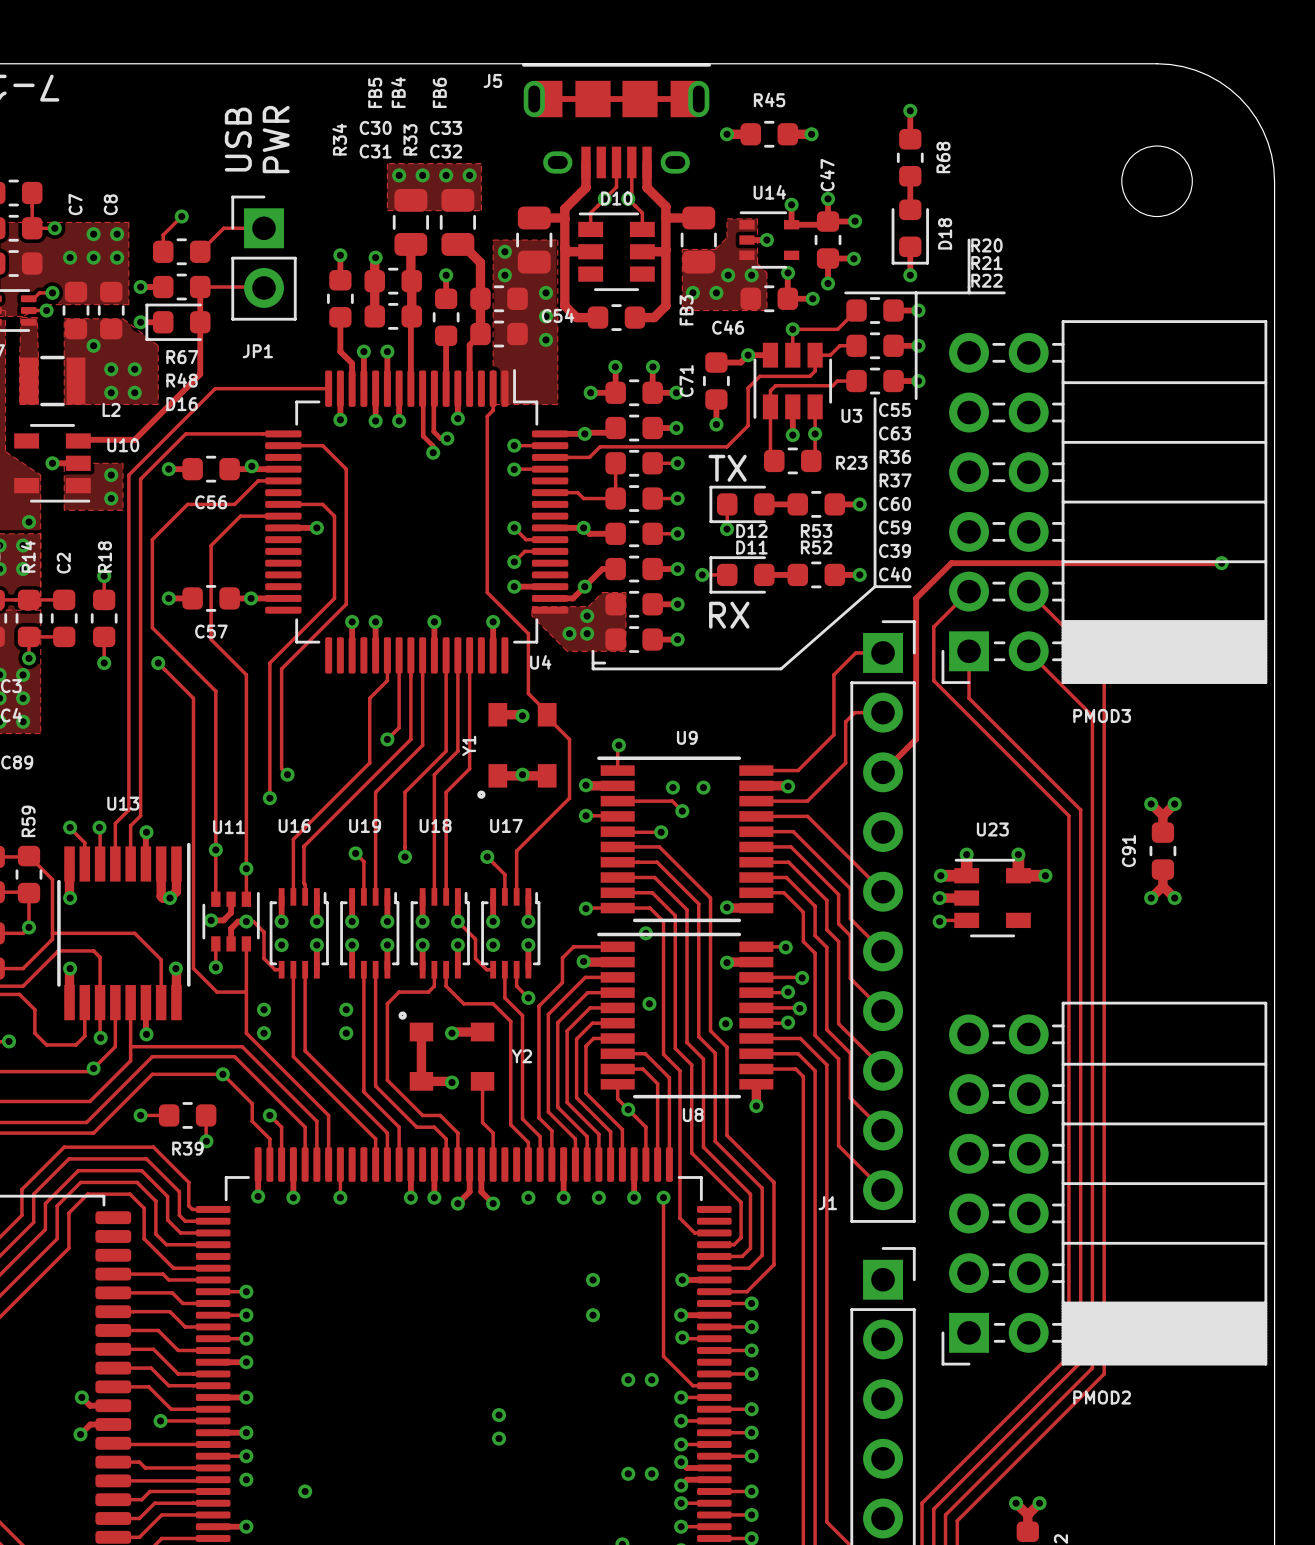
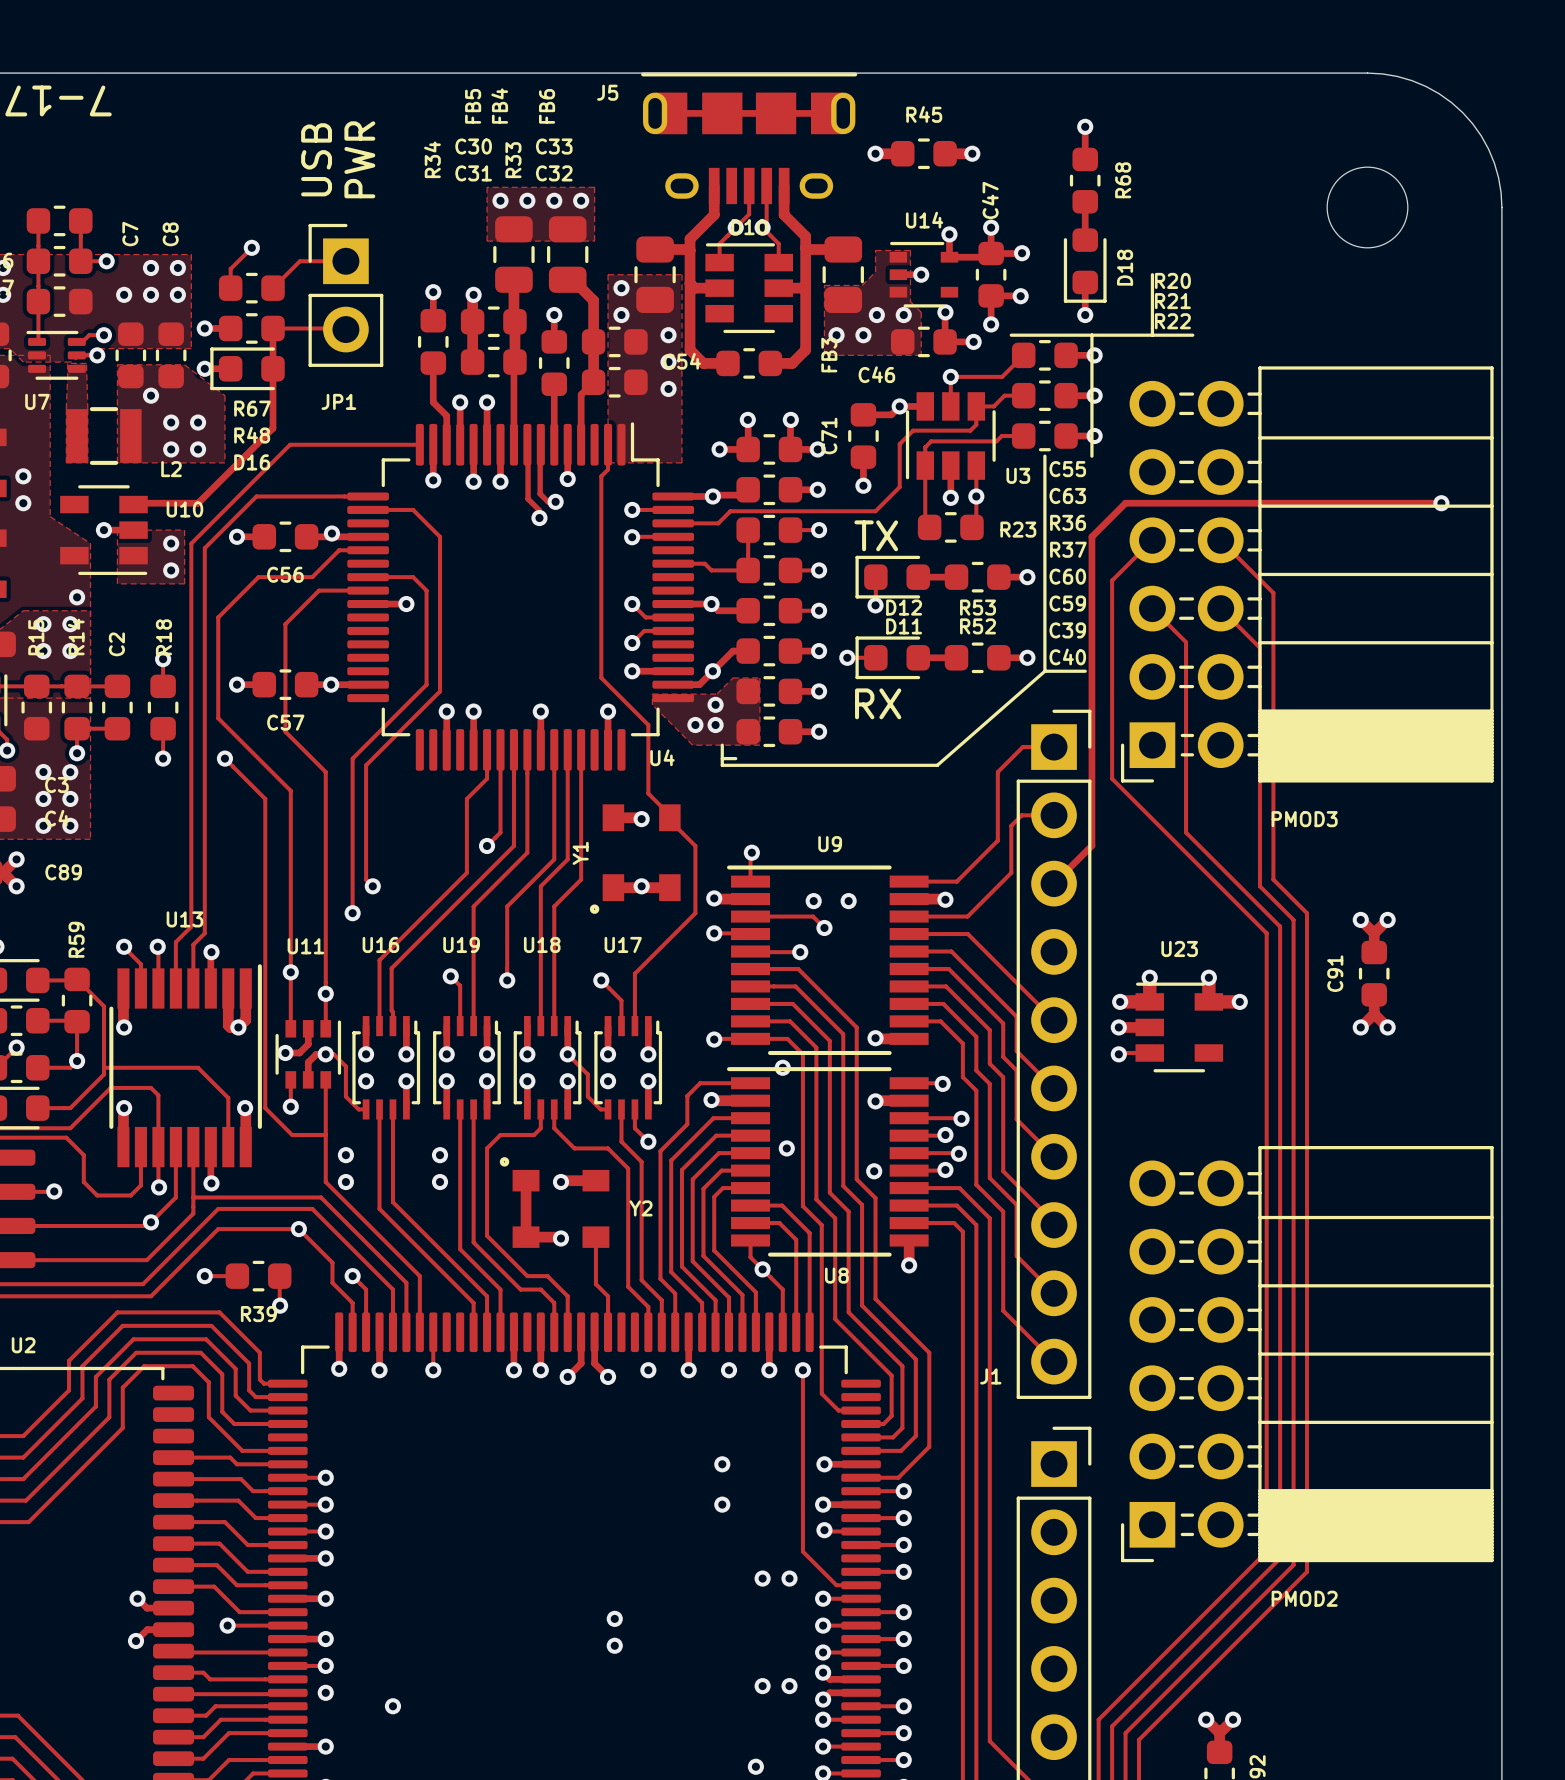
track: (1221, 563) (951, 563) (916, 598) -> (1441, 503) (1125, 503) (1091, 536) (1091, 684)
via position: (1221, 563) -> (1441, 503)
track: (969, 591) (933, 626) -> (1152, 540) (1112, 580) (1112, 717)
track: (1028, 591) (1104, 667) (1104, 798) -> (1220, 540) (1273, 593) (1273, 879) (1307, 913)
track: (969, 651) (969, 698) (998, 727) -> (1152, 608) (1186, 642) (1186, 832)
track: (1028, 651) (1092, 715) (1092, 804) -> (1220, 608) (1259, 647) (1259, 886) (1293, 919)

